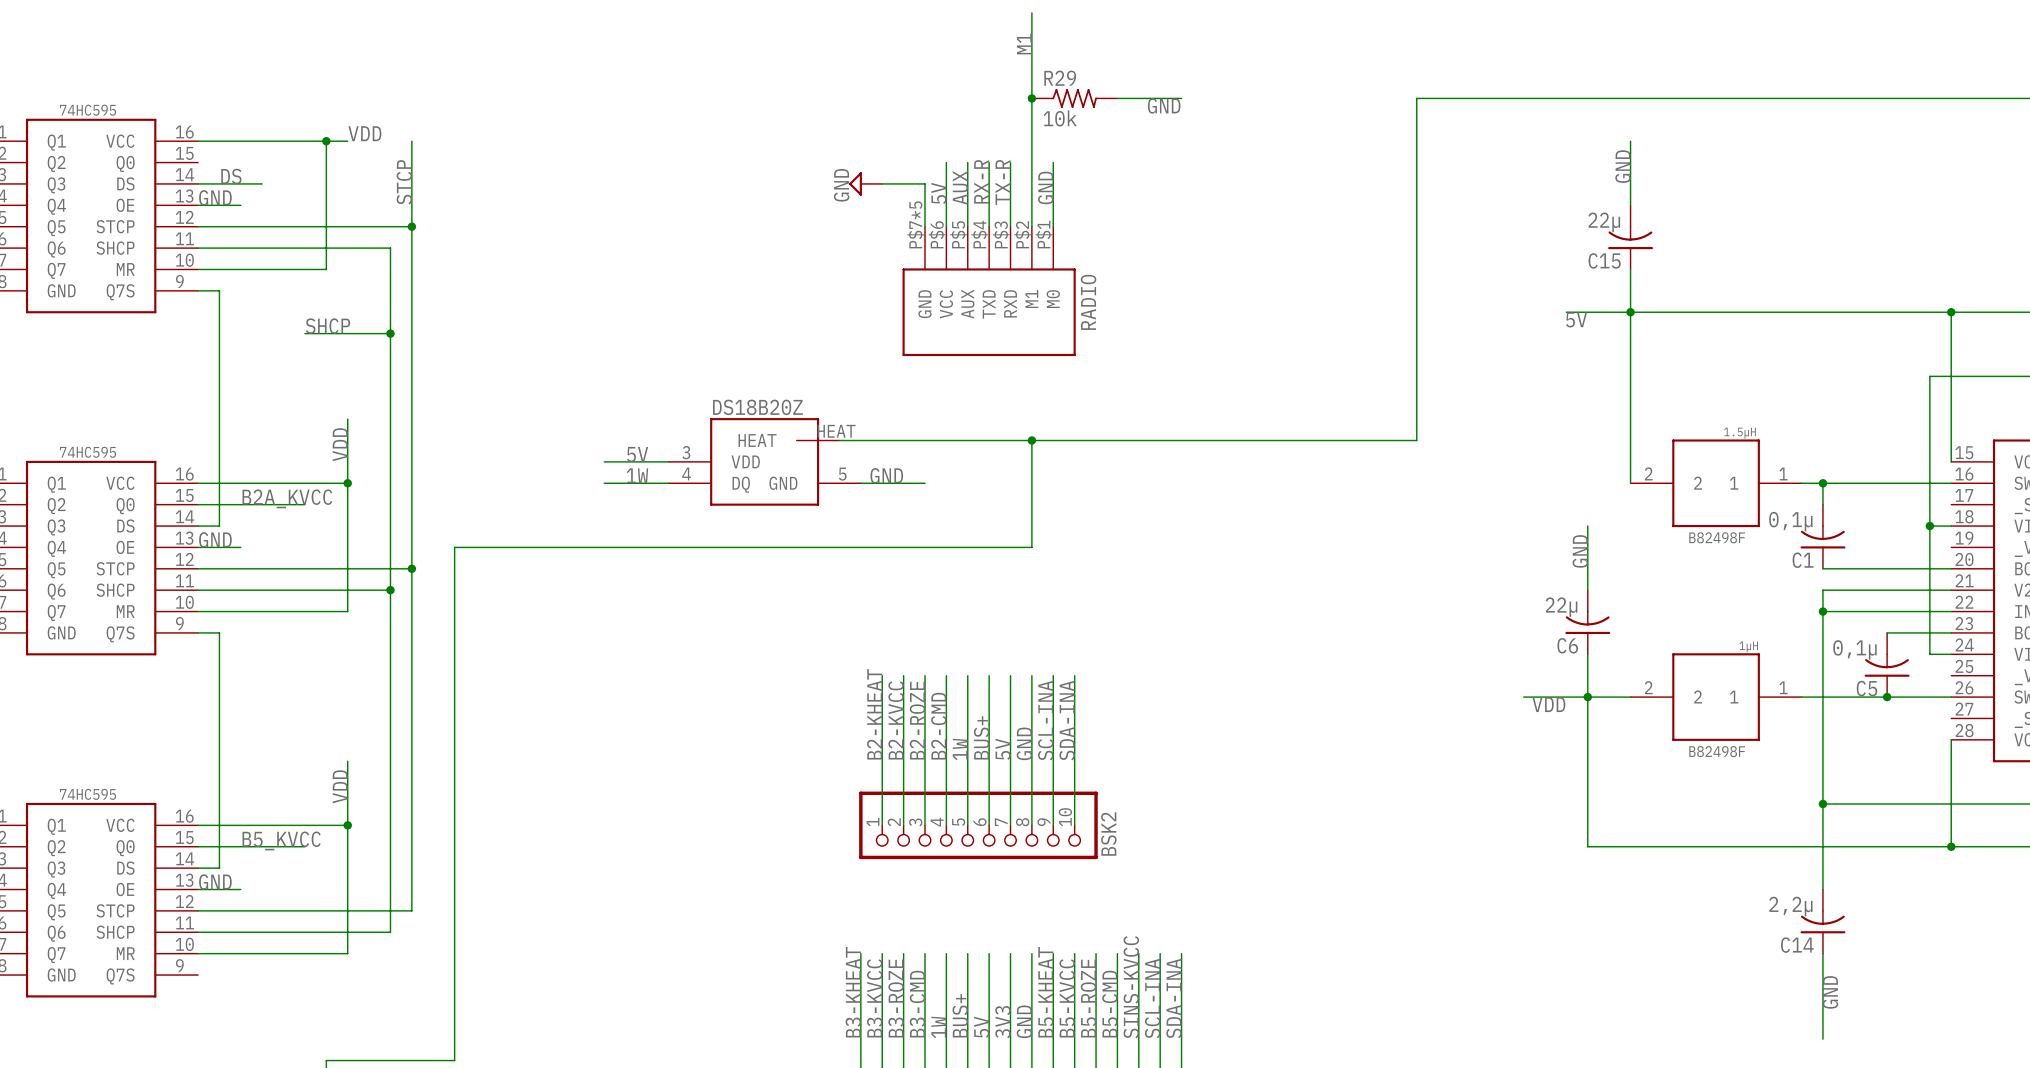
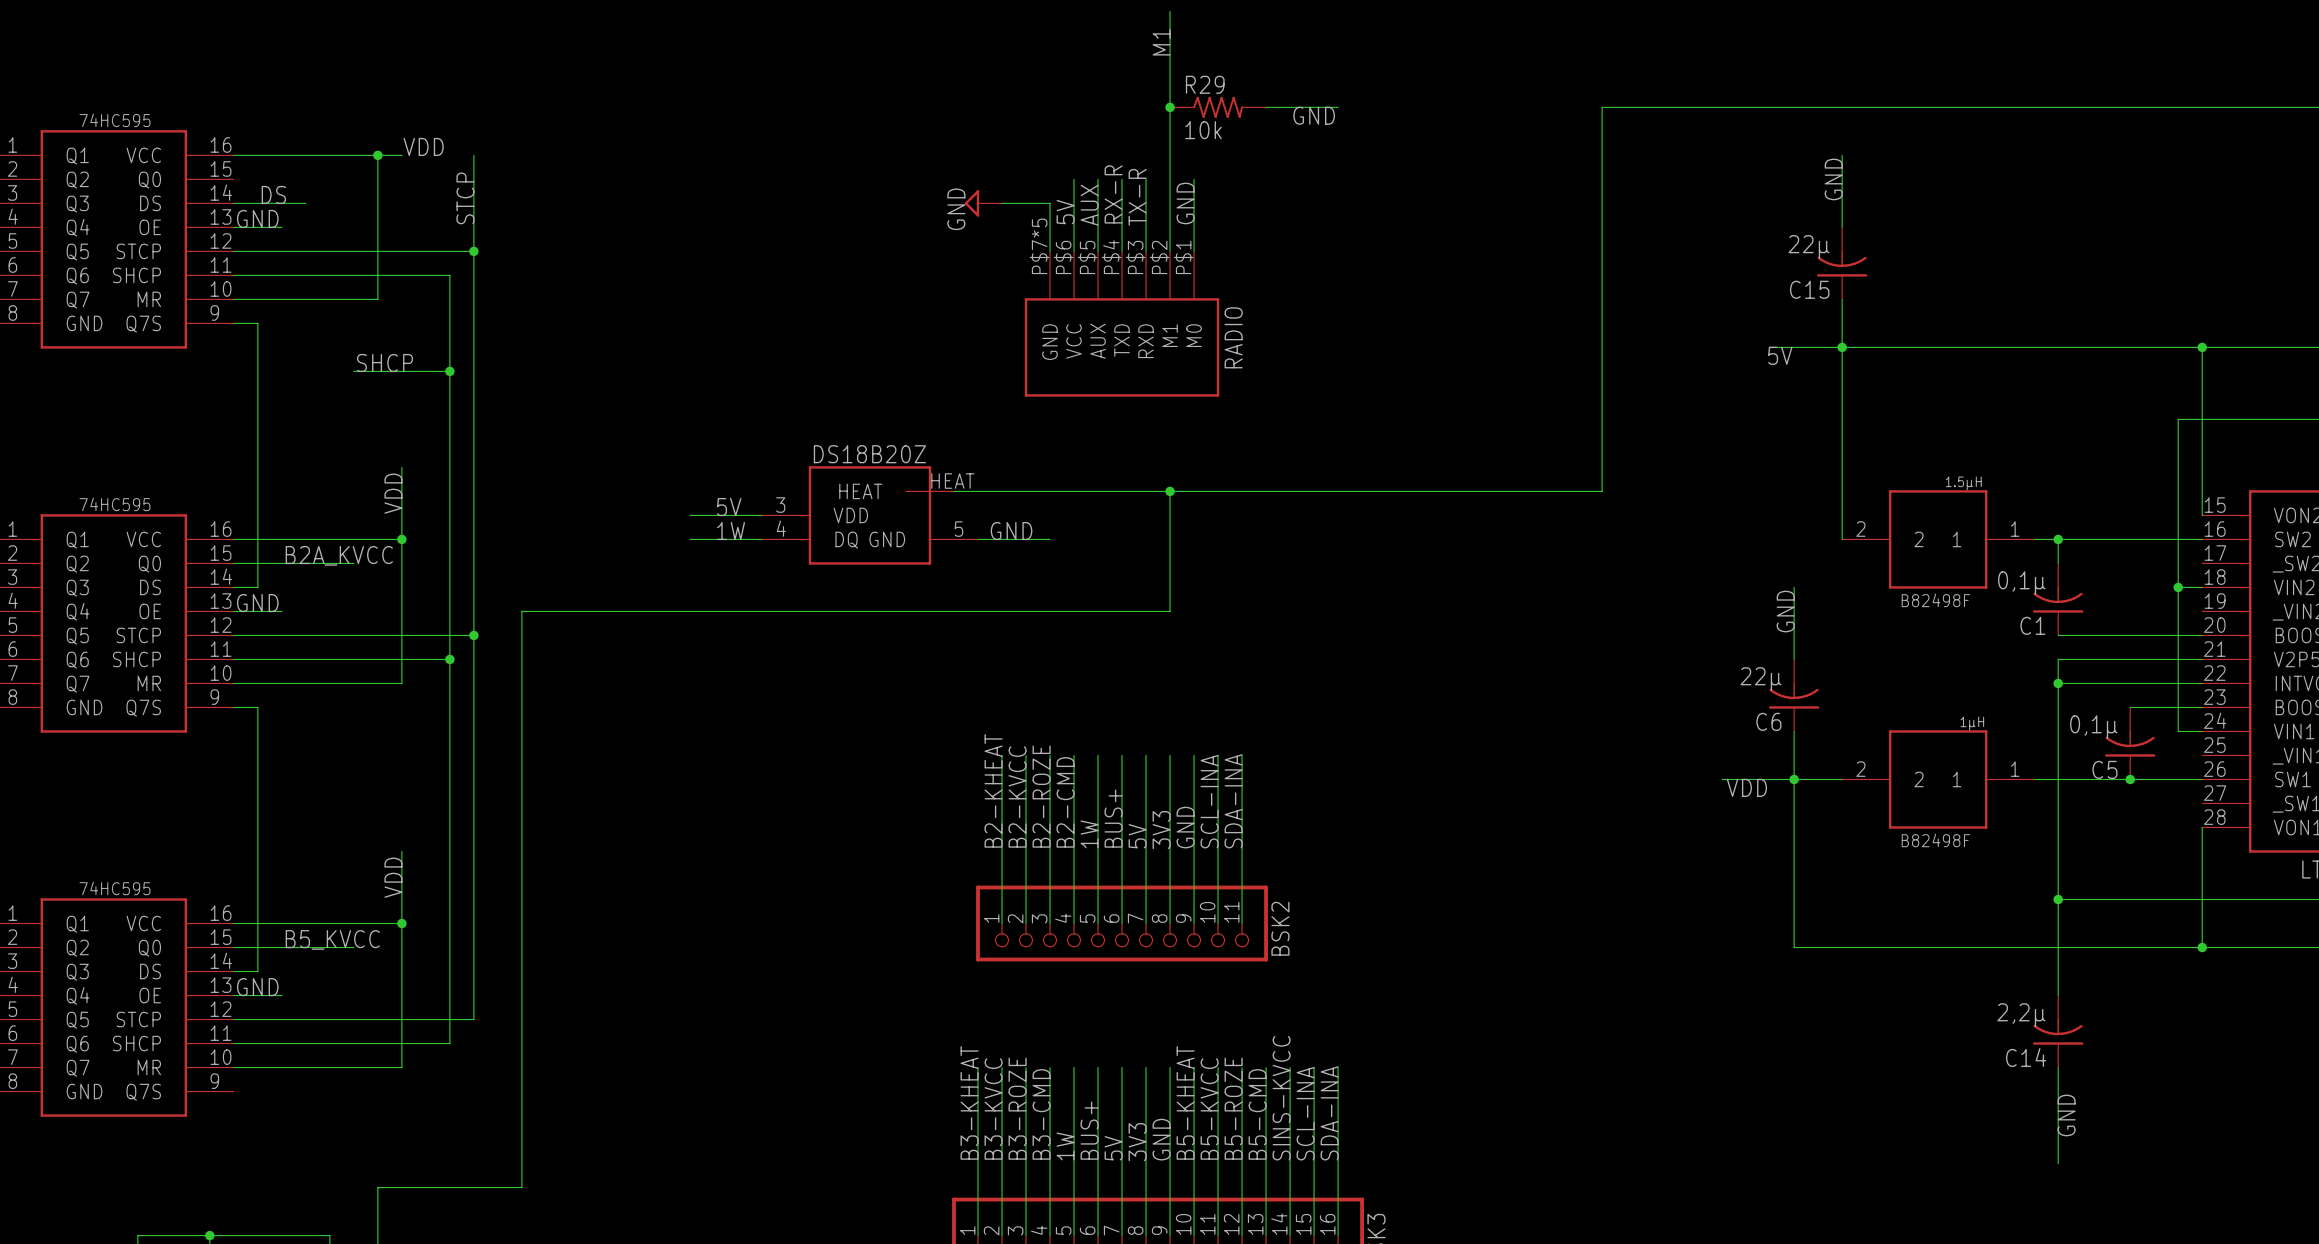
wire: none -> (1242, 755) (1242, 923)
label: SCL-INA (1045, 720) -> GND (1185, 827)
label: SDA-INA (1067, 720) -> SCL-INA (1209, 801)
label: none -> SDA-INA (1233, 801)
label: GND (1024, 743) -> 3V3 (1161, 830)
BSK2 symbol: [859, 791, 1098, 860] -> [976, 885, 1268, 962]

